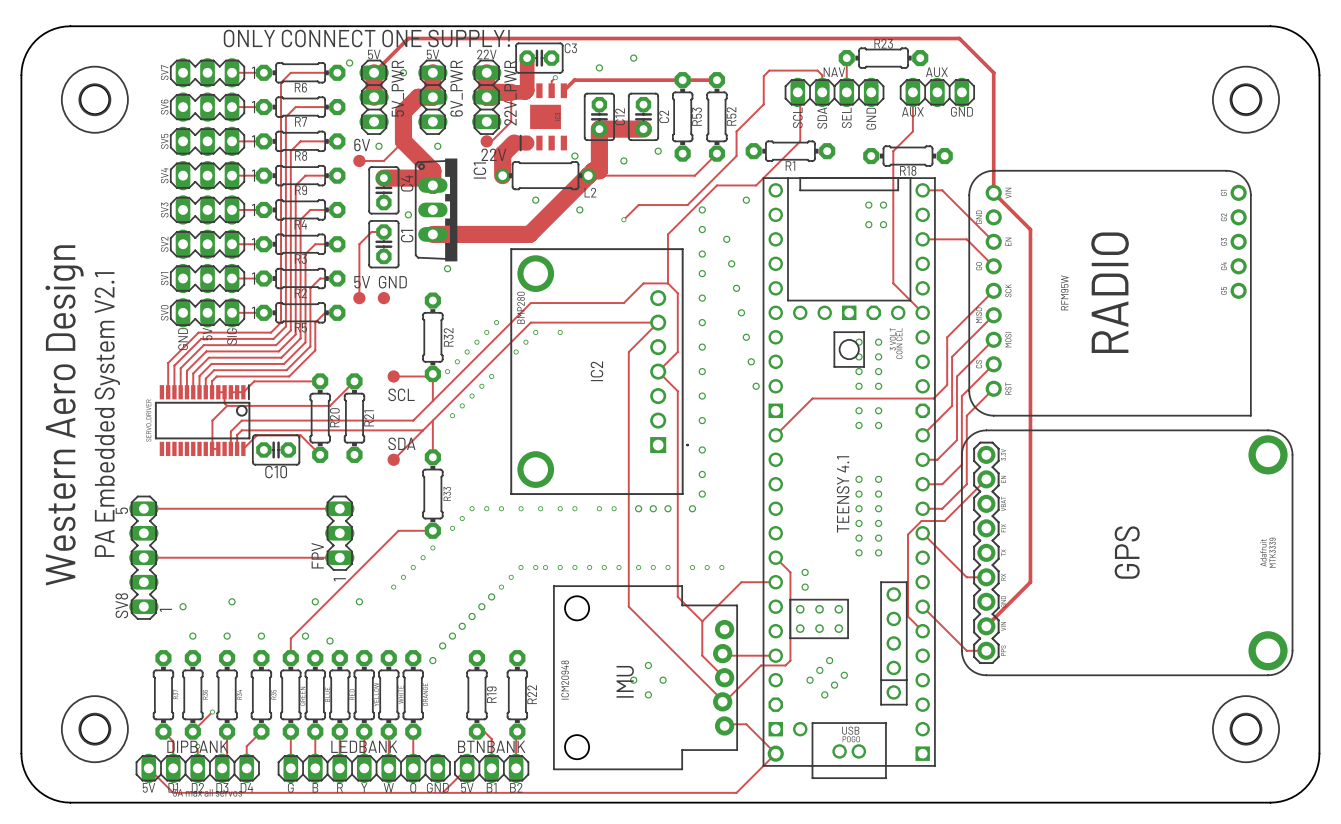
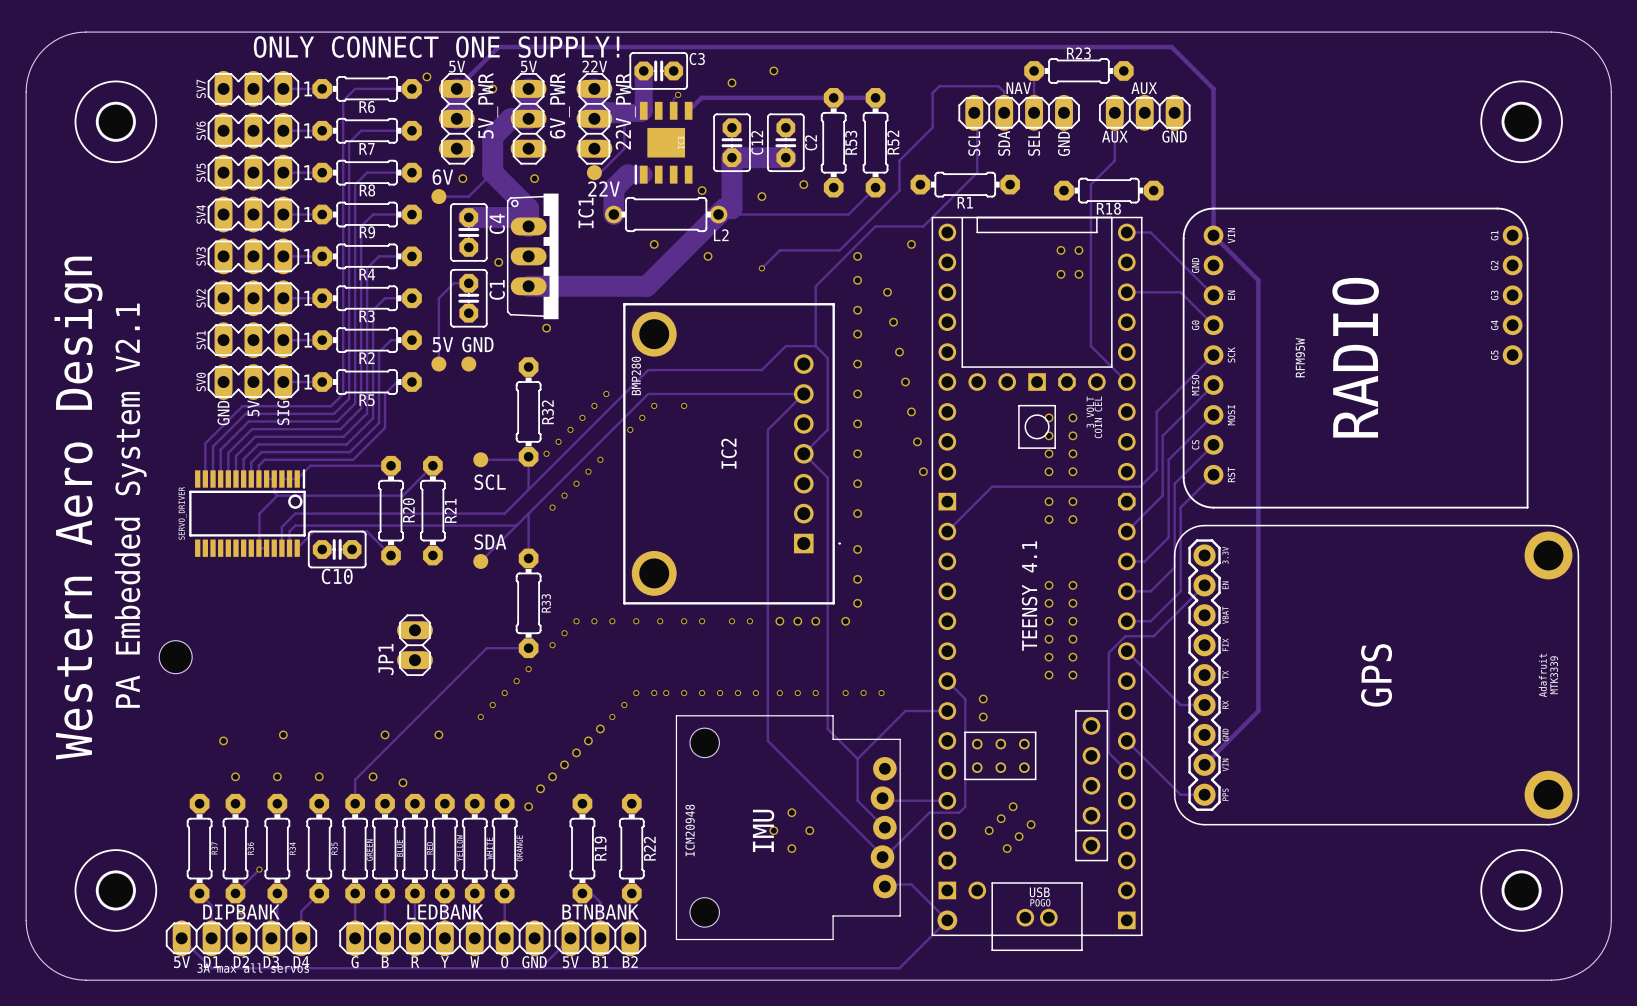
track: (143, 508) (339, 508) -> none
JP1: none -> (414, 645)
FPV: (339, 533) -> none
hole: none -> (175, 657)
track: (143, 557) (339, 557) -> none
SV8: (143, 557) -> none

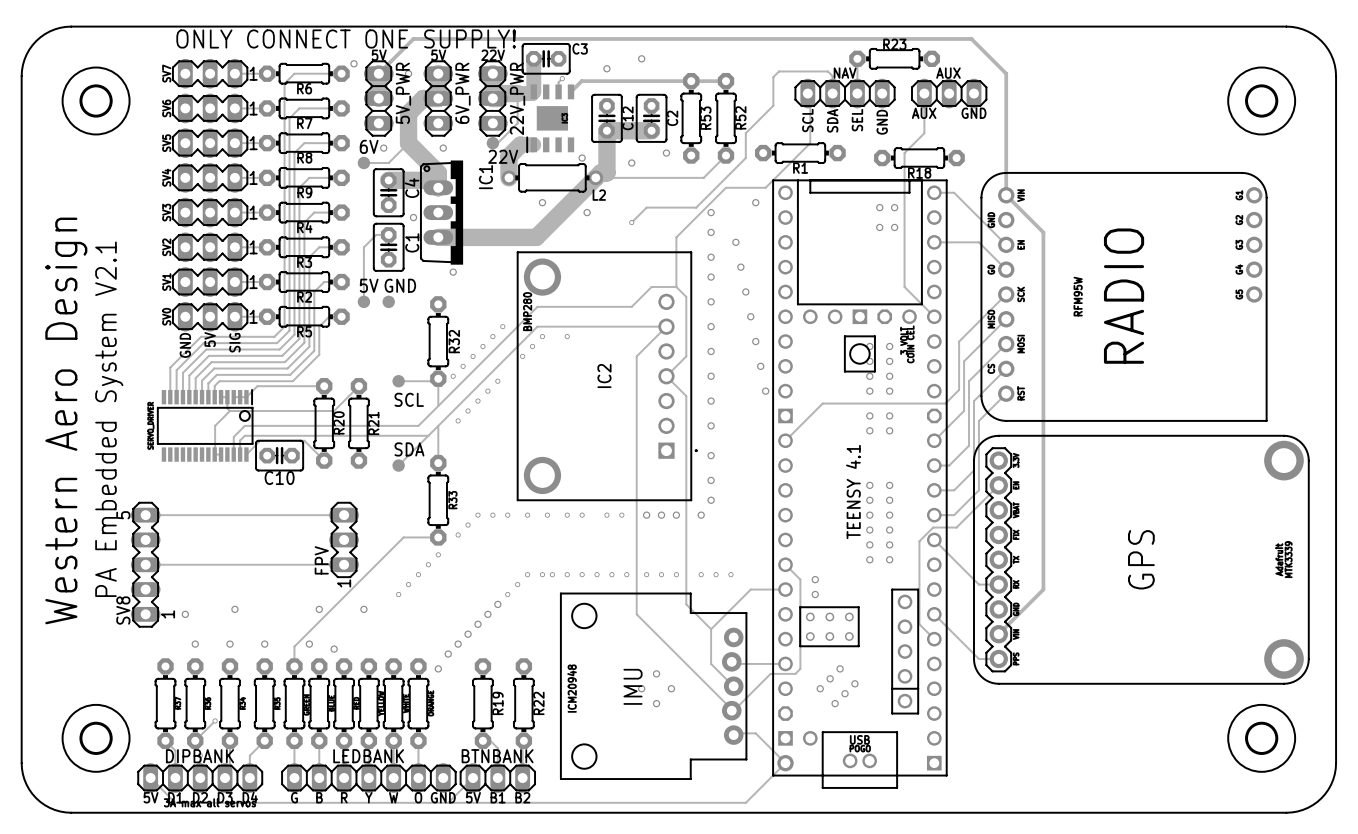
track: none -> (145, 515) (344, 515)
JP1: (414, 645) -> none
FPV: none -> (344, 539)
hole: (175, 657) -> none
track: none -> (145, 564) (344, 564)
SV8: none -> (145, 564)

